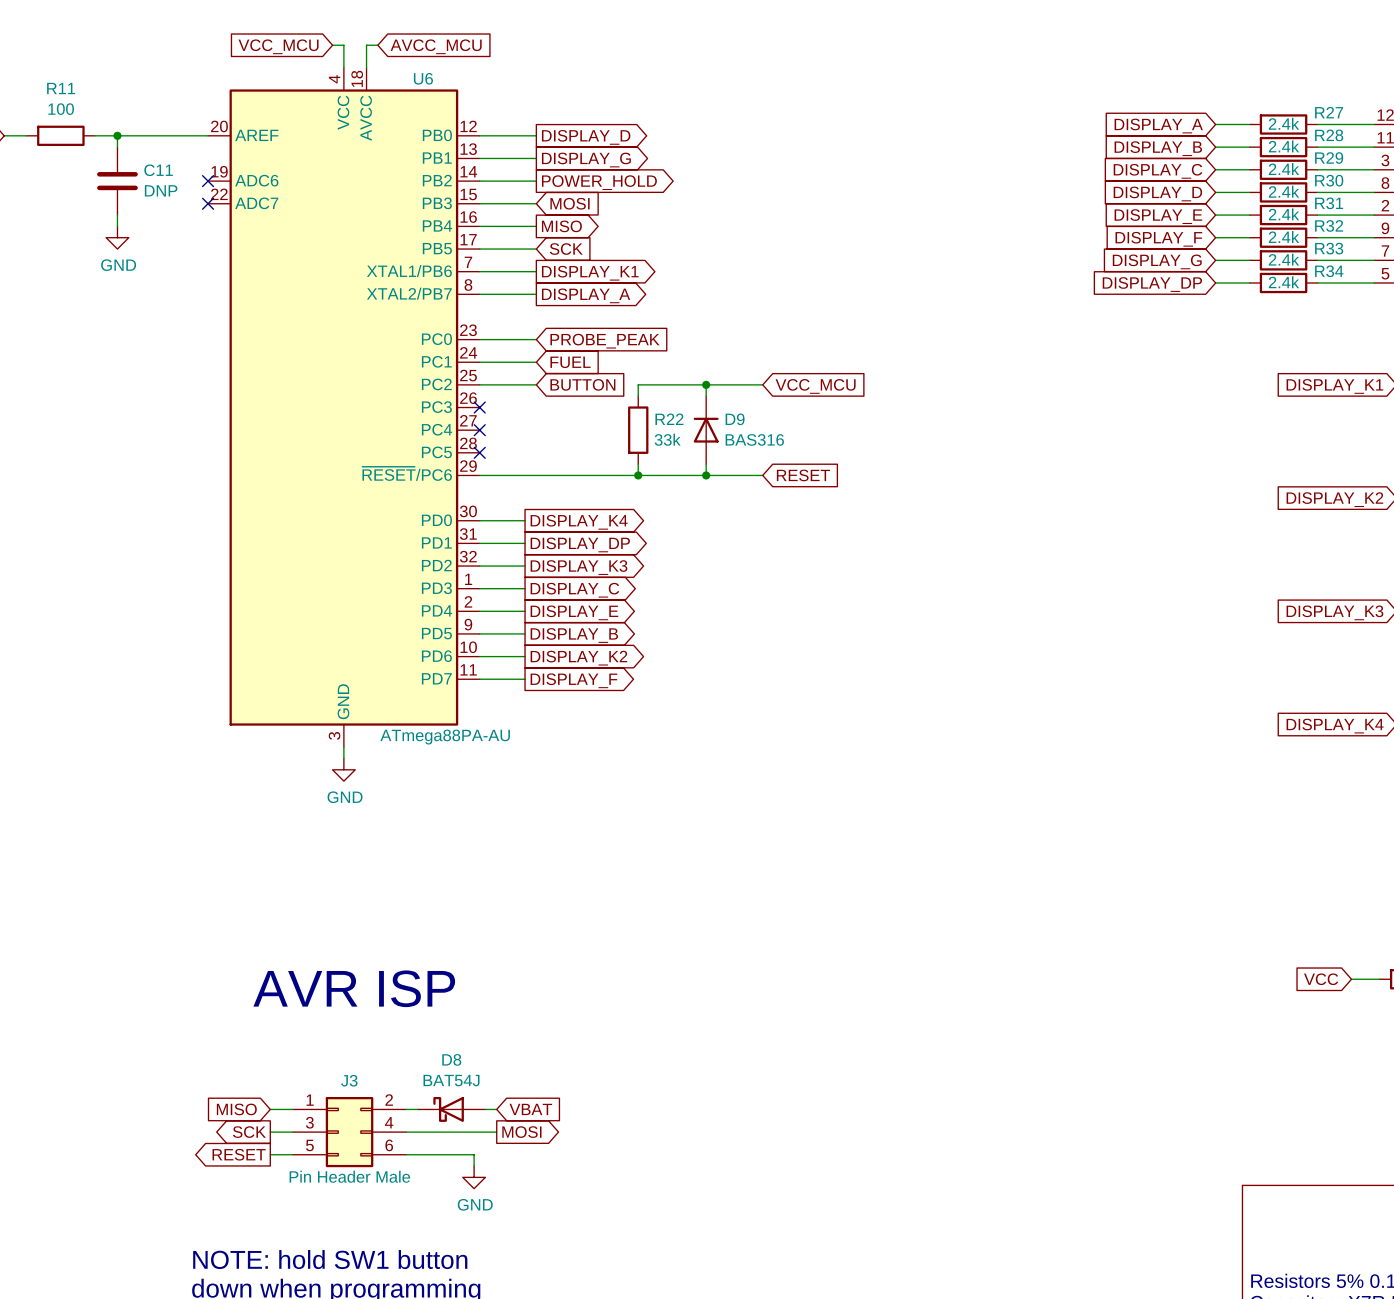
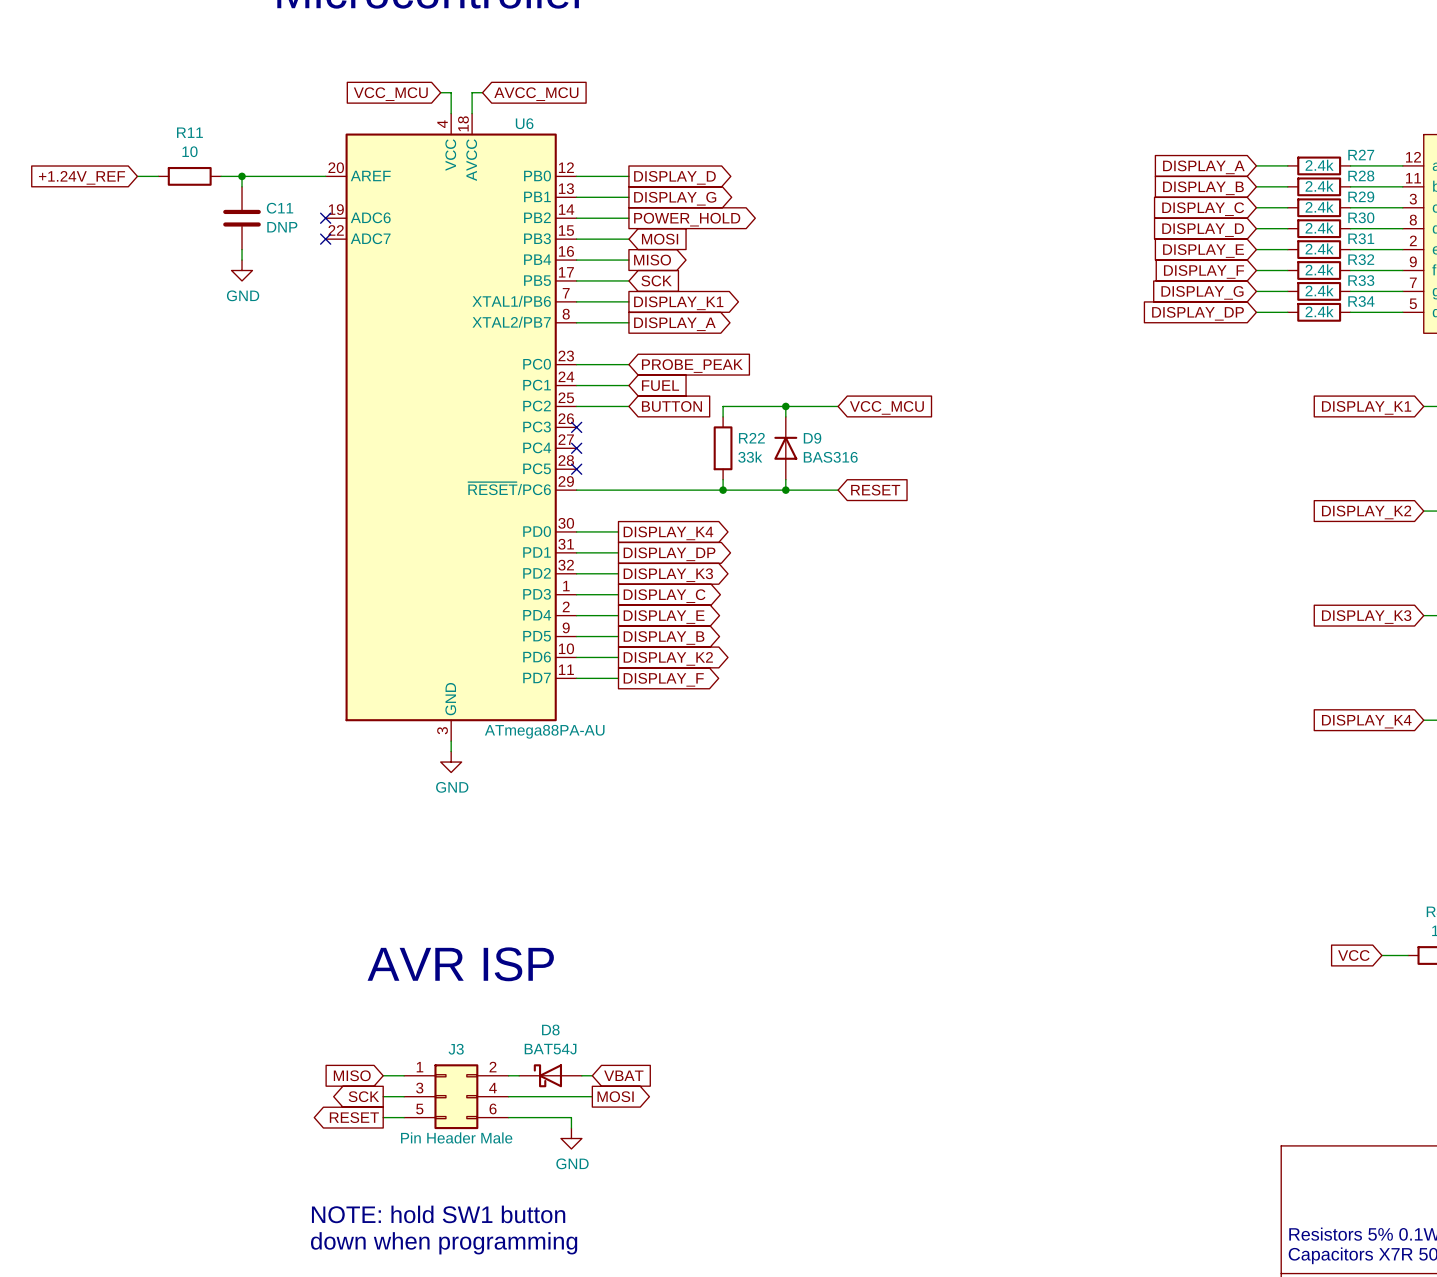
R11 value: 100 (61, 109) -> 10 (190, 151)

